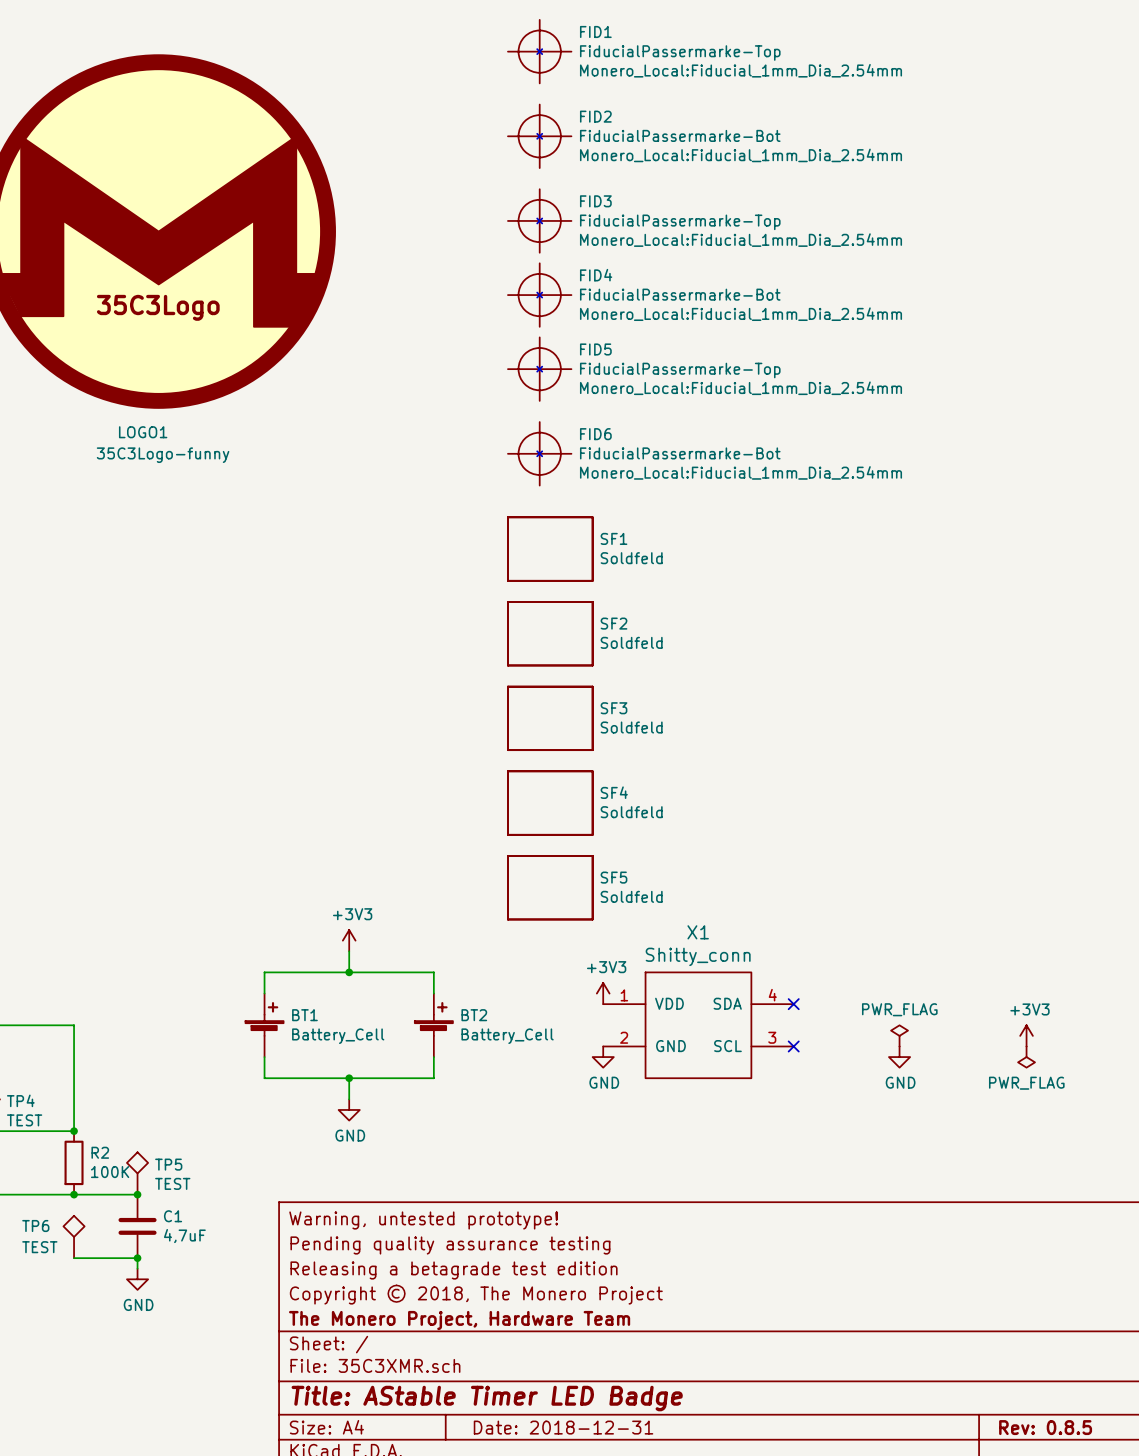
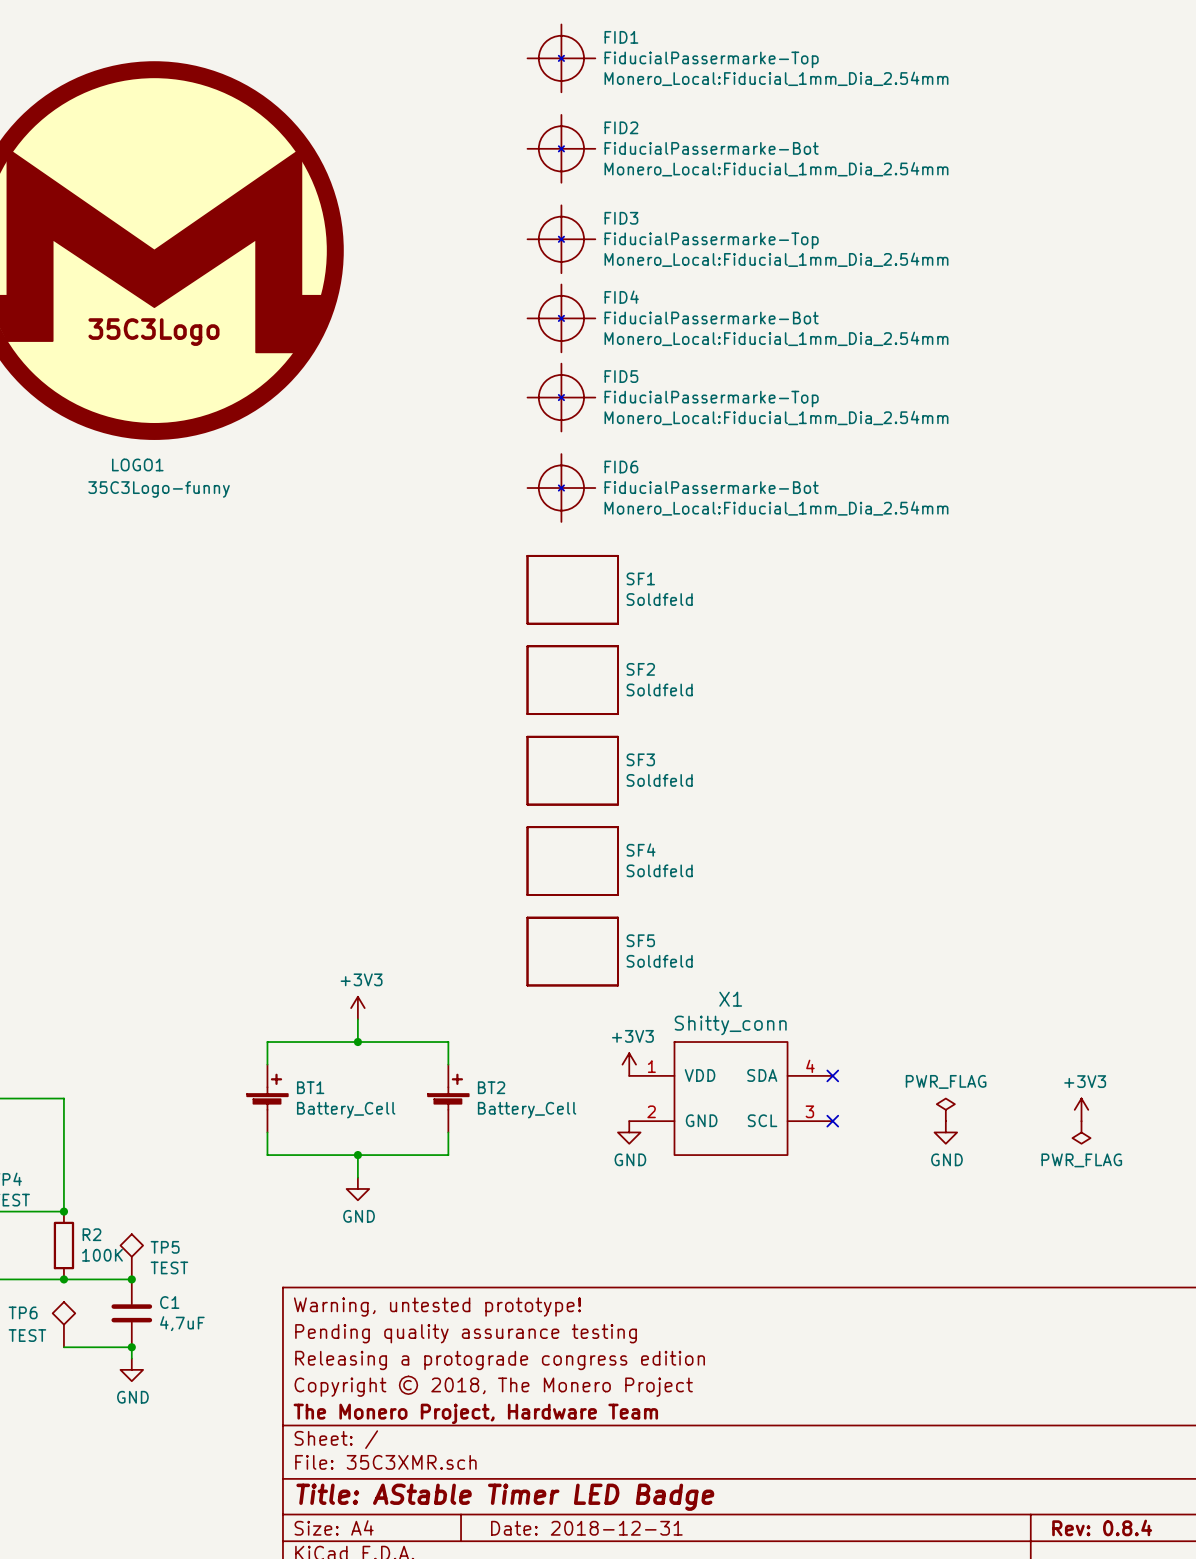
title block: Releasing a betagrade test edition (454, 1270) -> Releasing a protograde congress edition (500, 1360)
title block: Rev: 0.8.5 (1045, 1427) -> Rev: 0.8.4 (1102, 1527)

